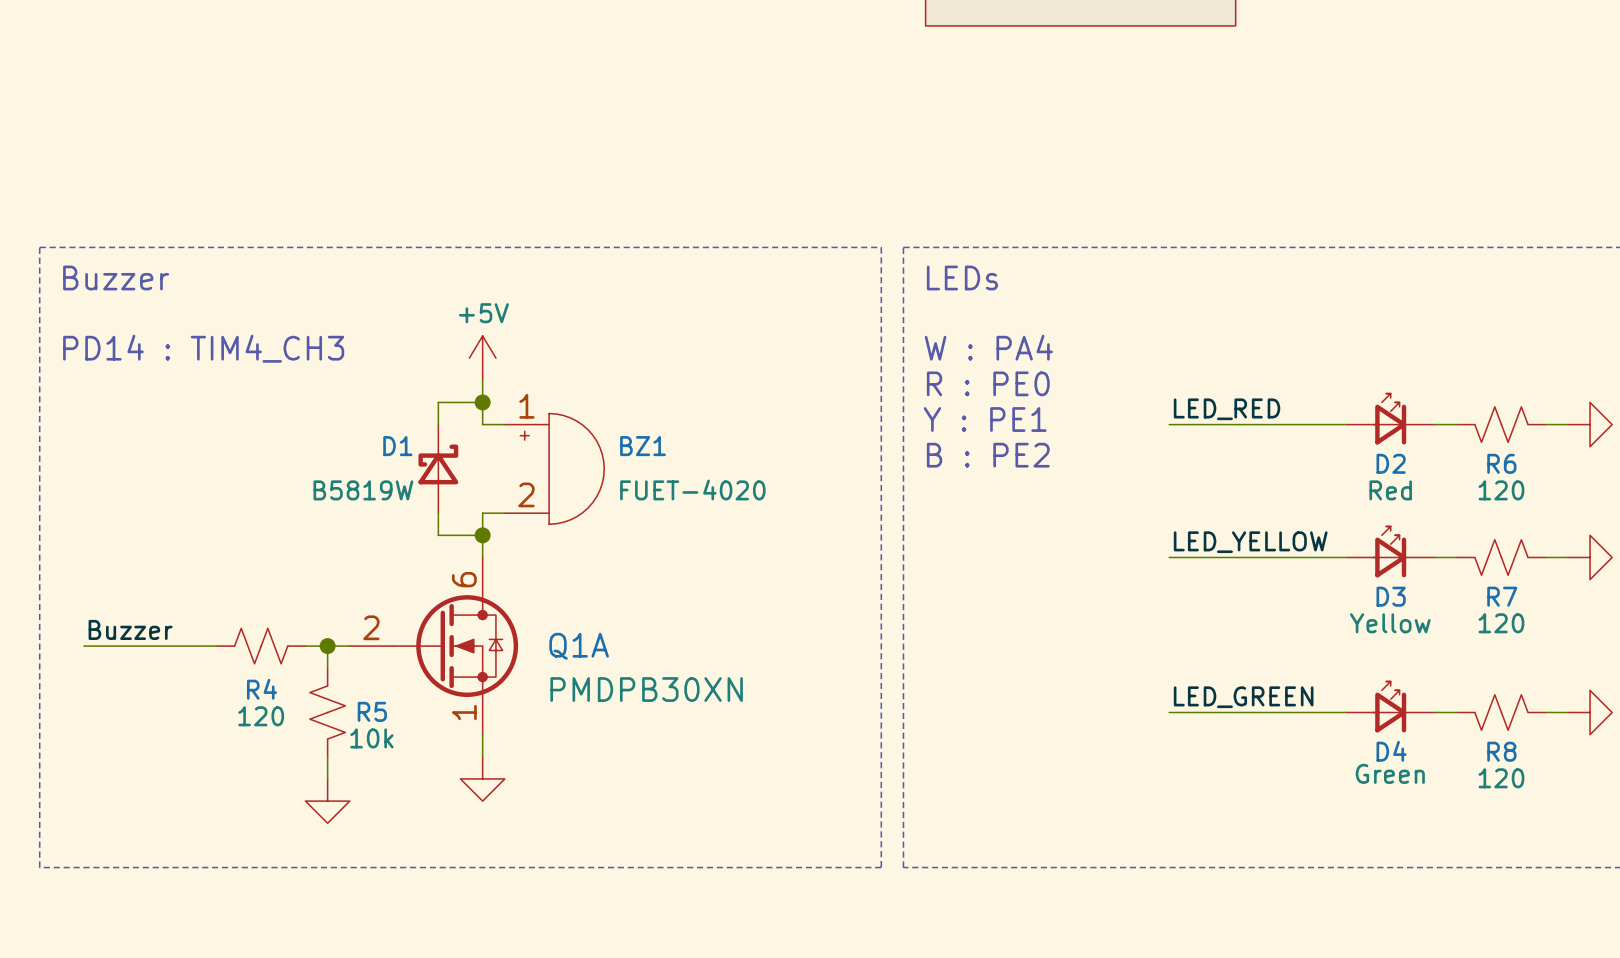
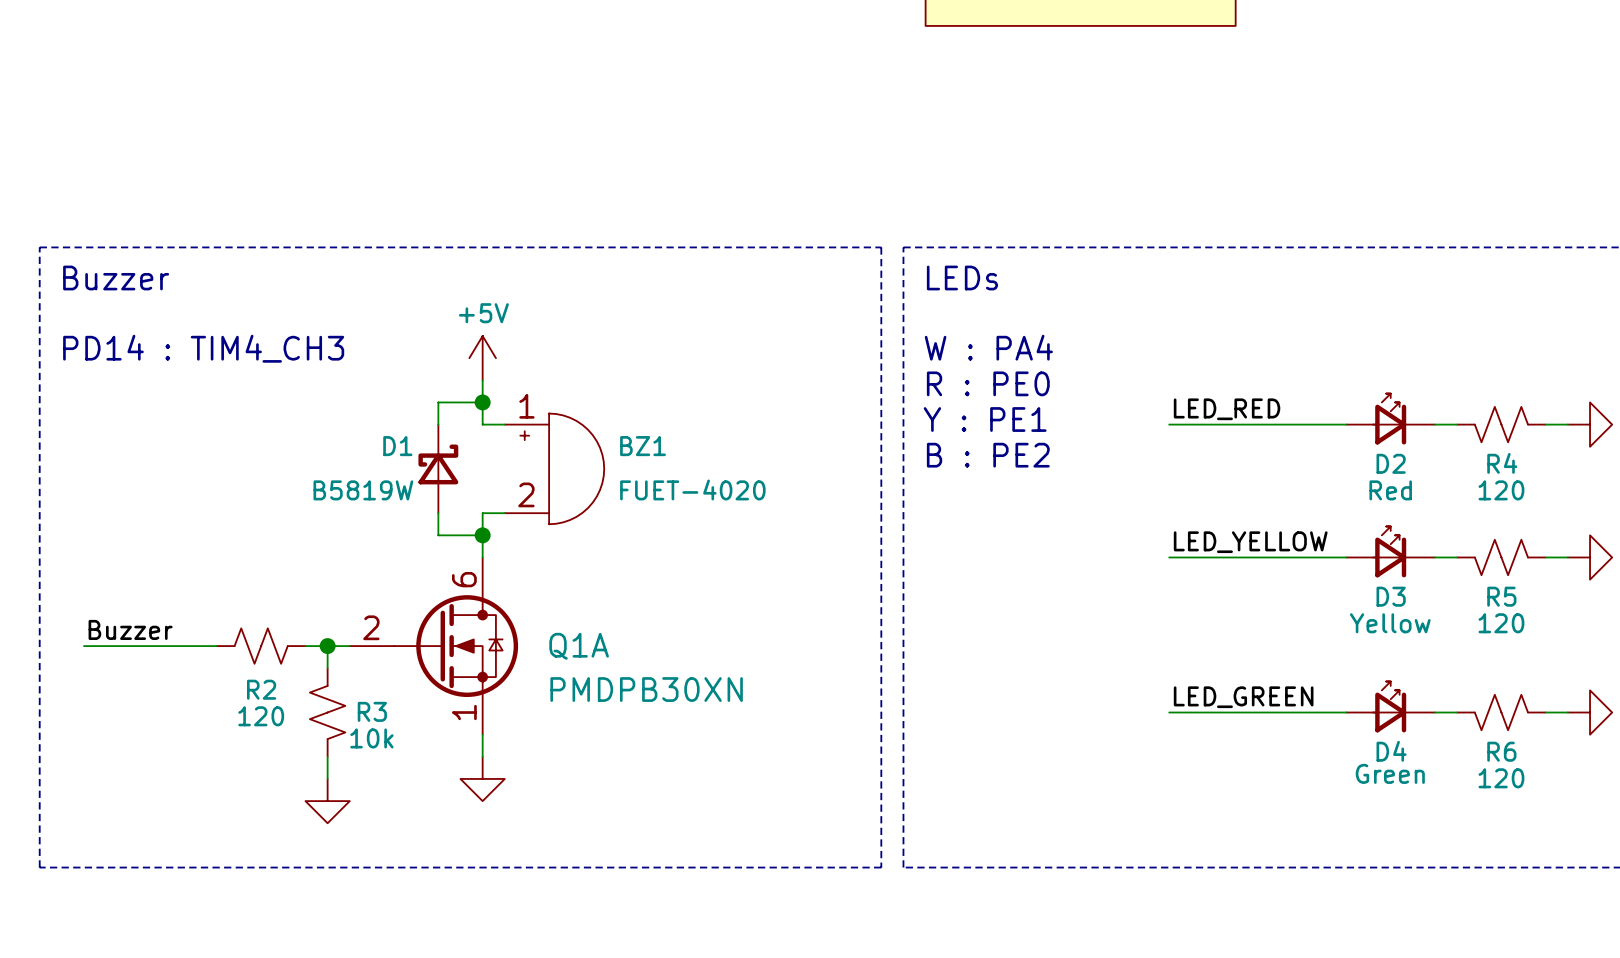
R6 name: R6 (1501, 463) -> R4 (1502, 463)
R7 name: R7 (1502, 596) -> R5 (1501, 596)
R4 name: R4 (262, 689) -> R2 (261, 689)
R5 name: R5 (372, 711) -> R3 (372, 711)
R8 name: R8 (1501, 751) -> R6 (1501, 751)

